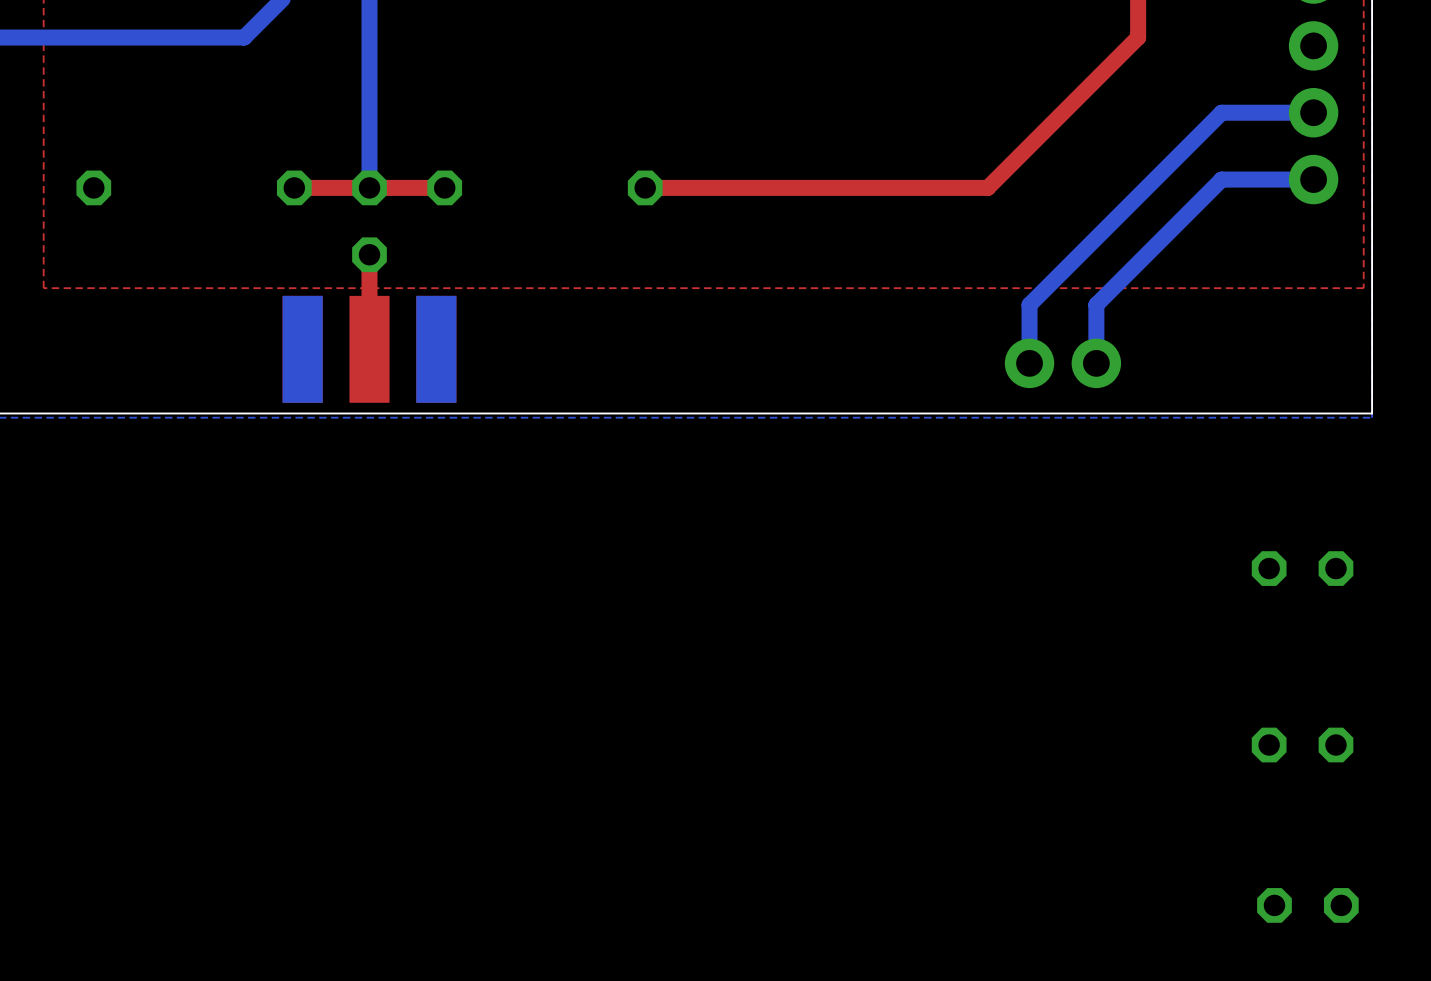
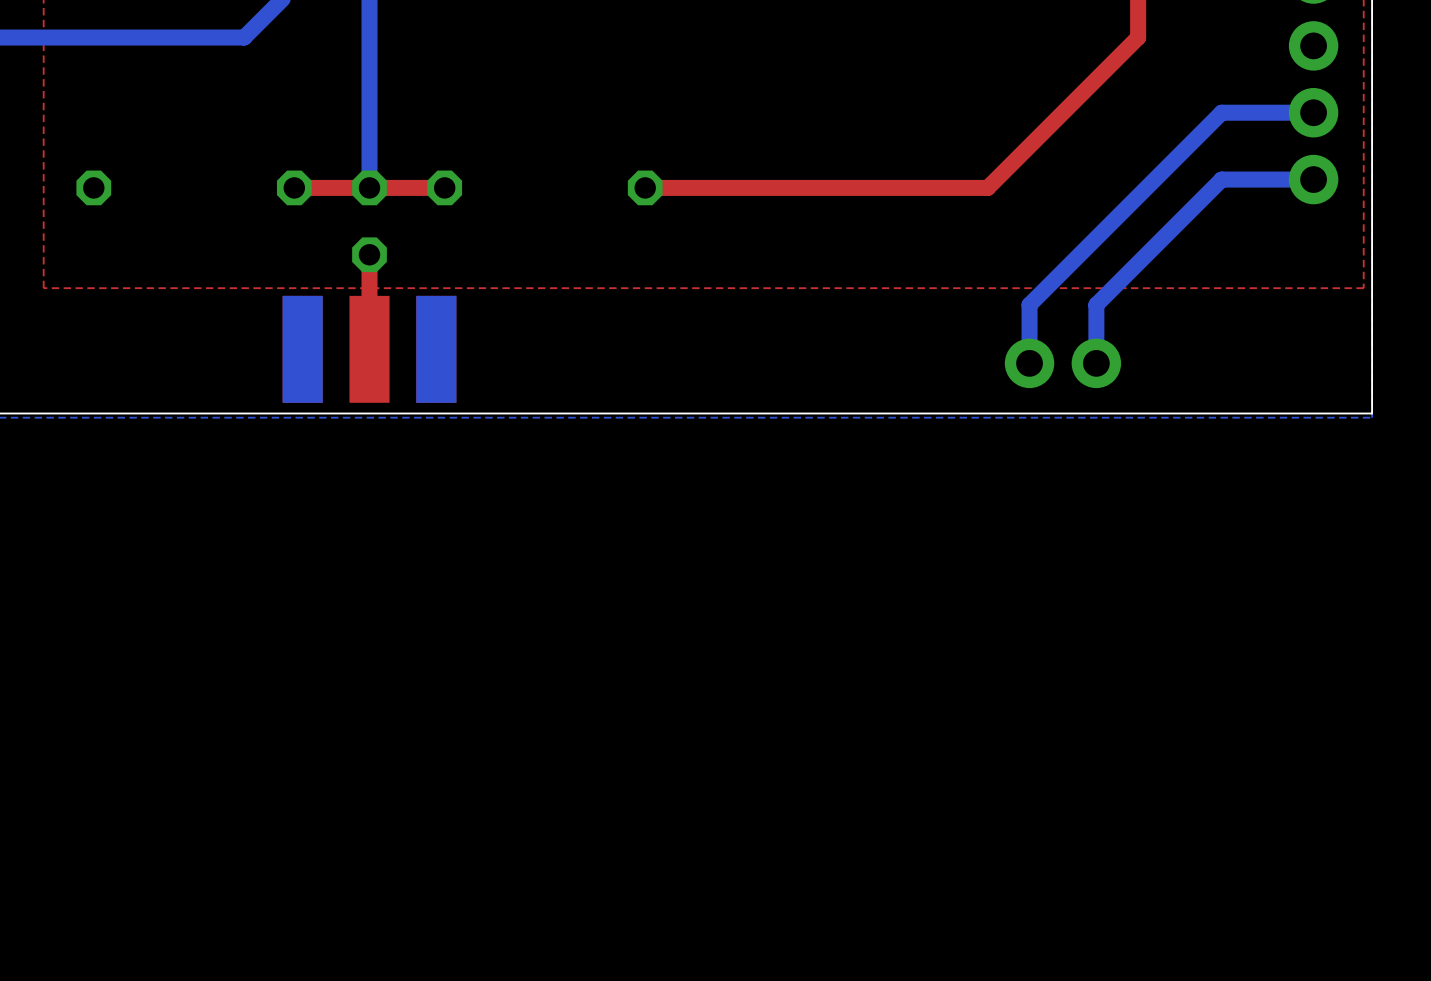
part: (1302, 568) -> none
part: (1302, 745) -> none
part: (1307, 905) -> none

